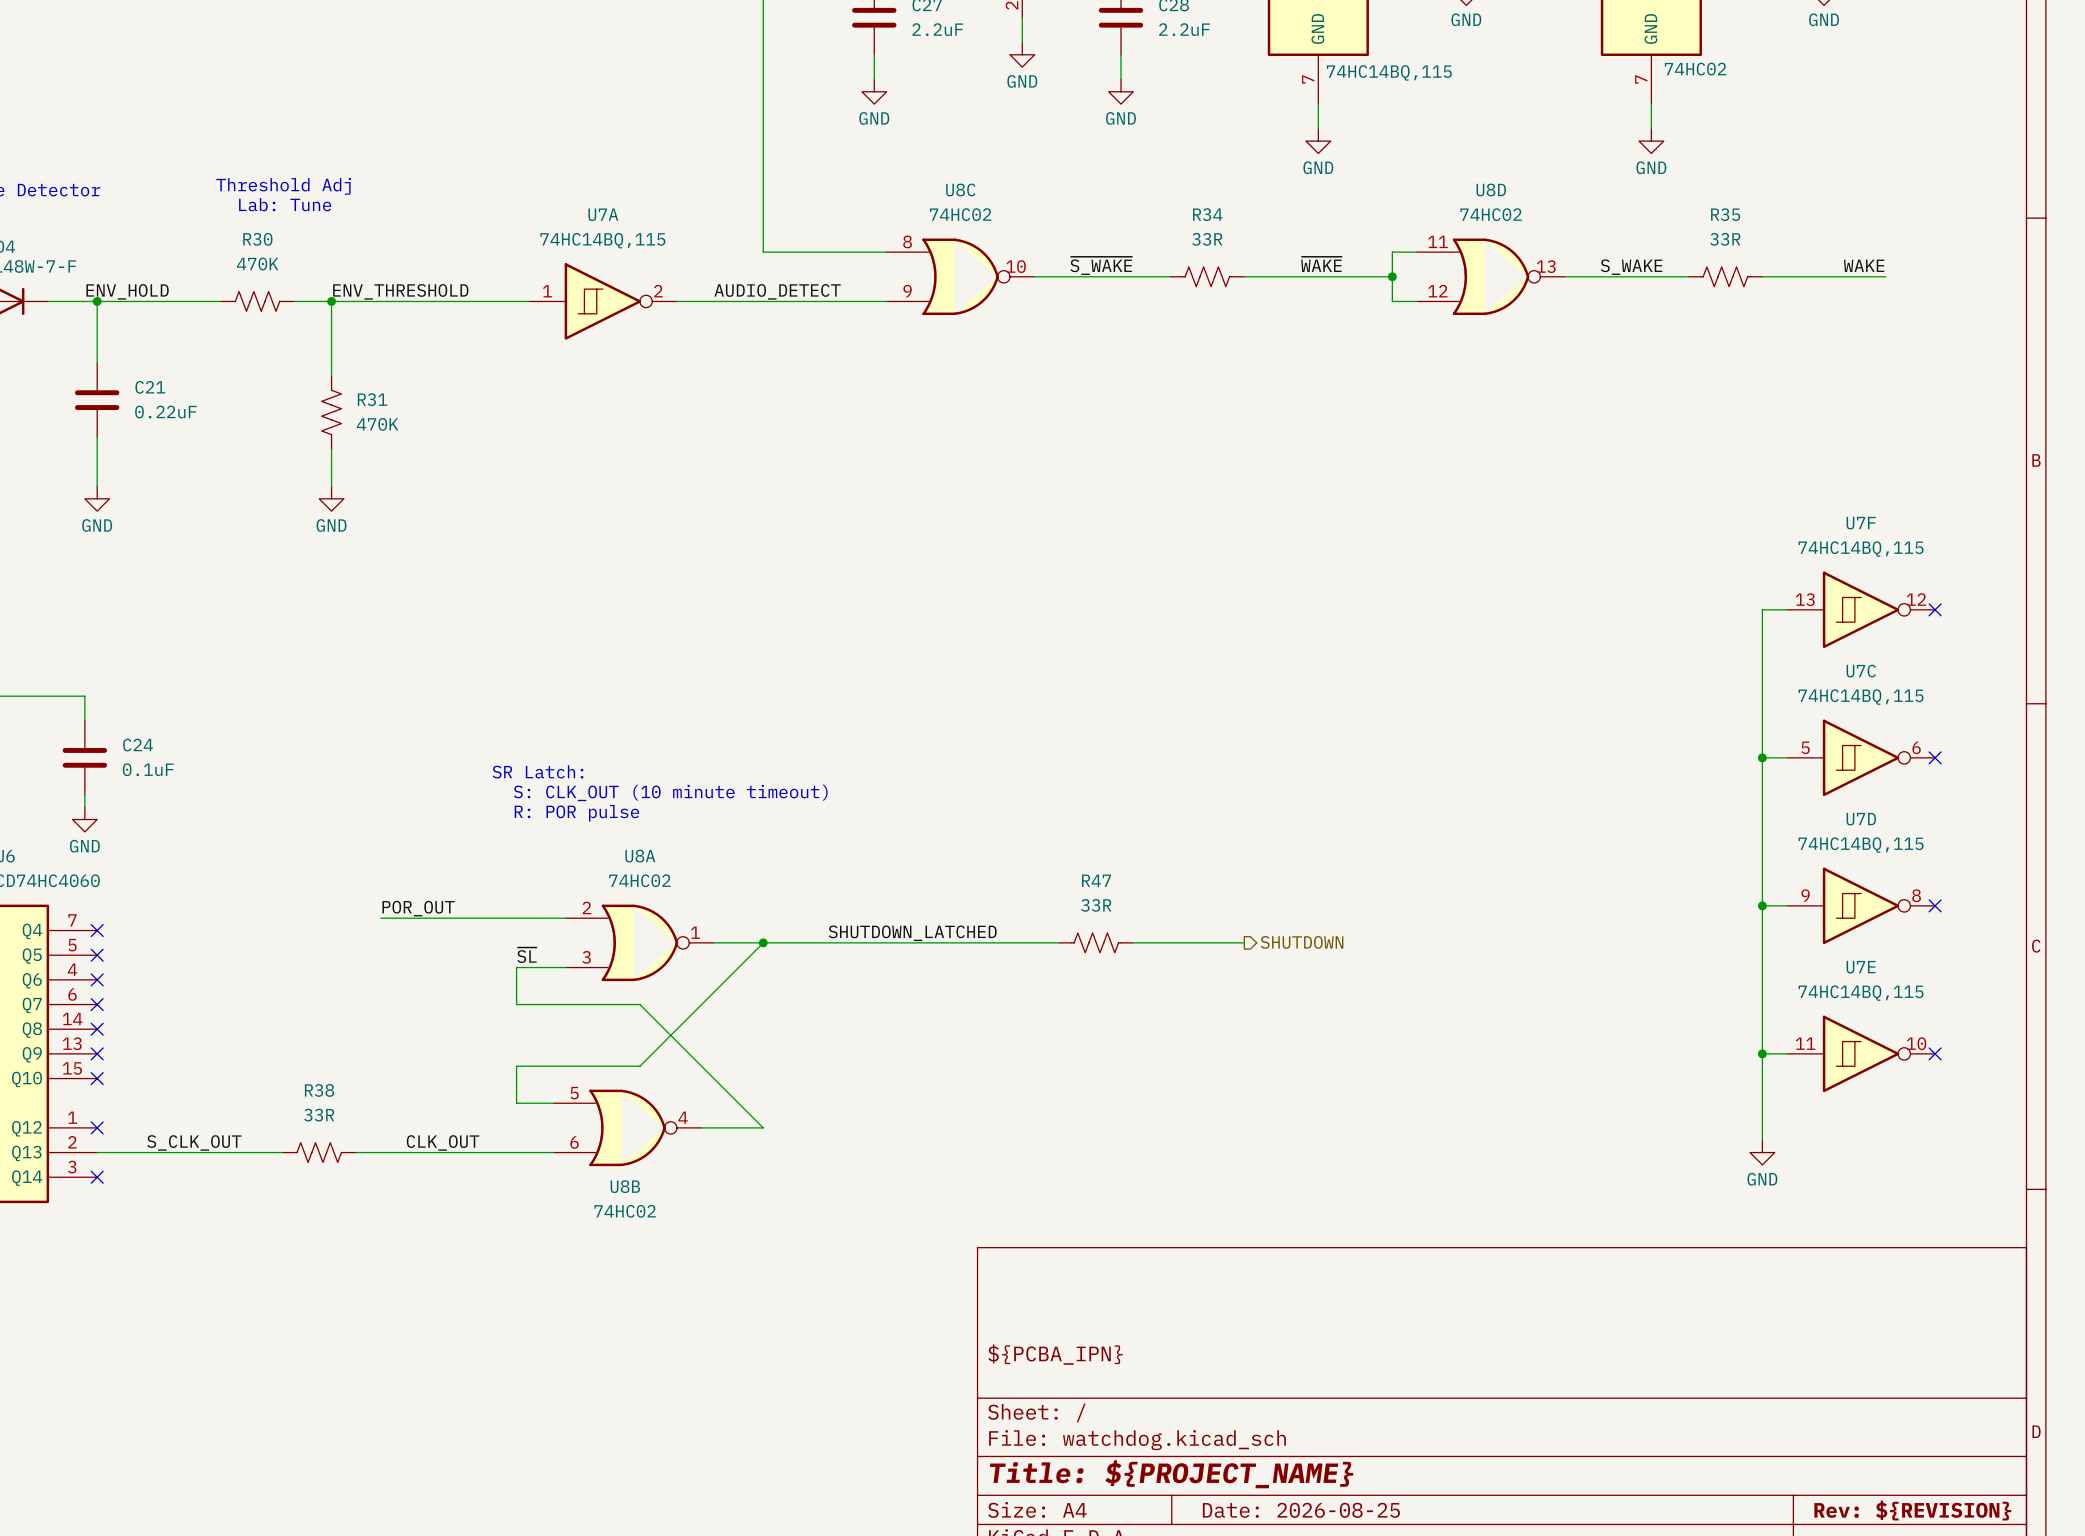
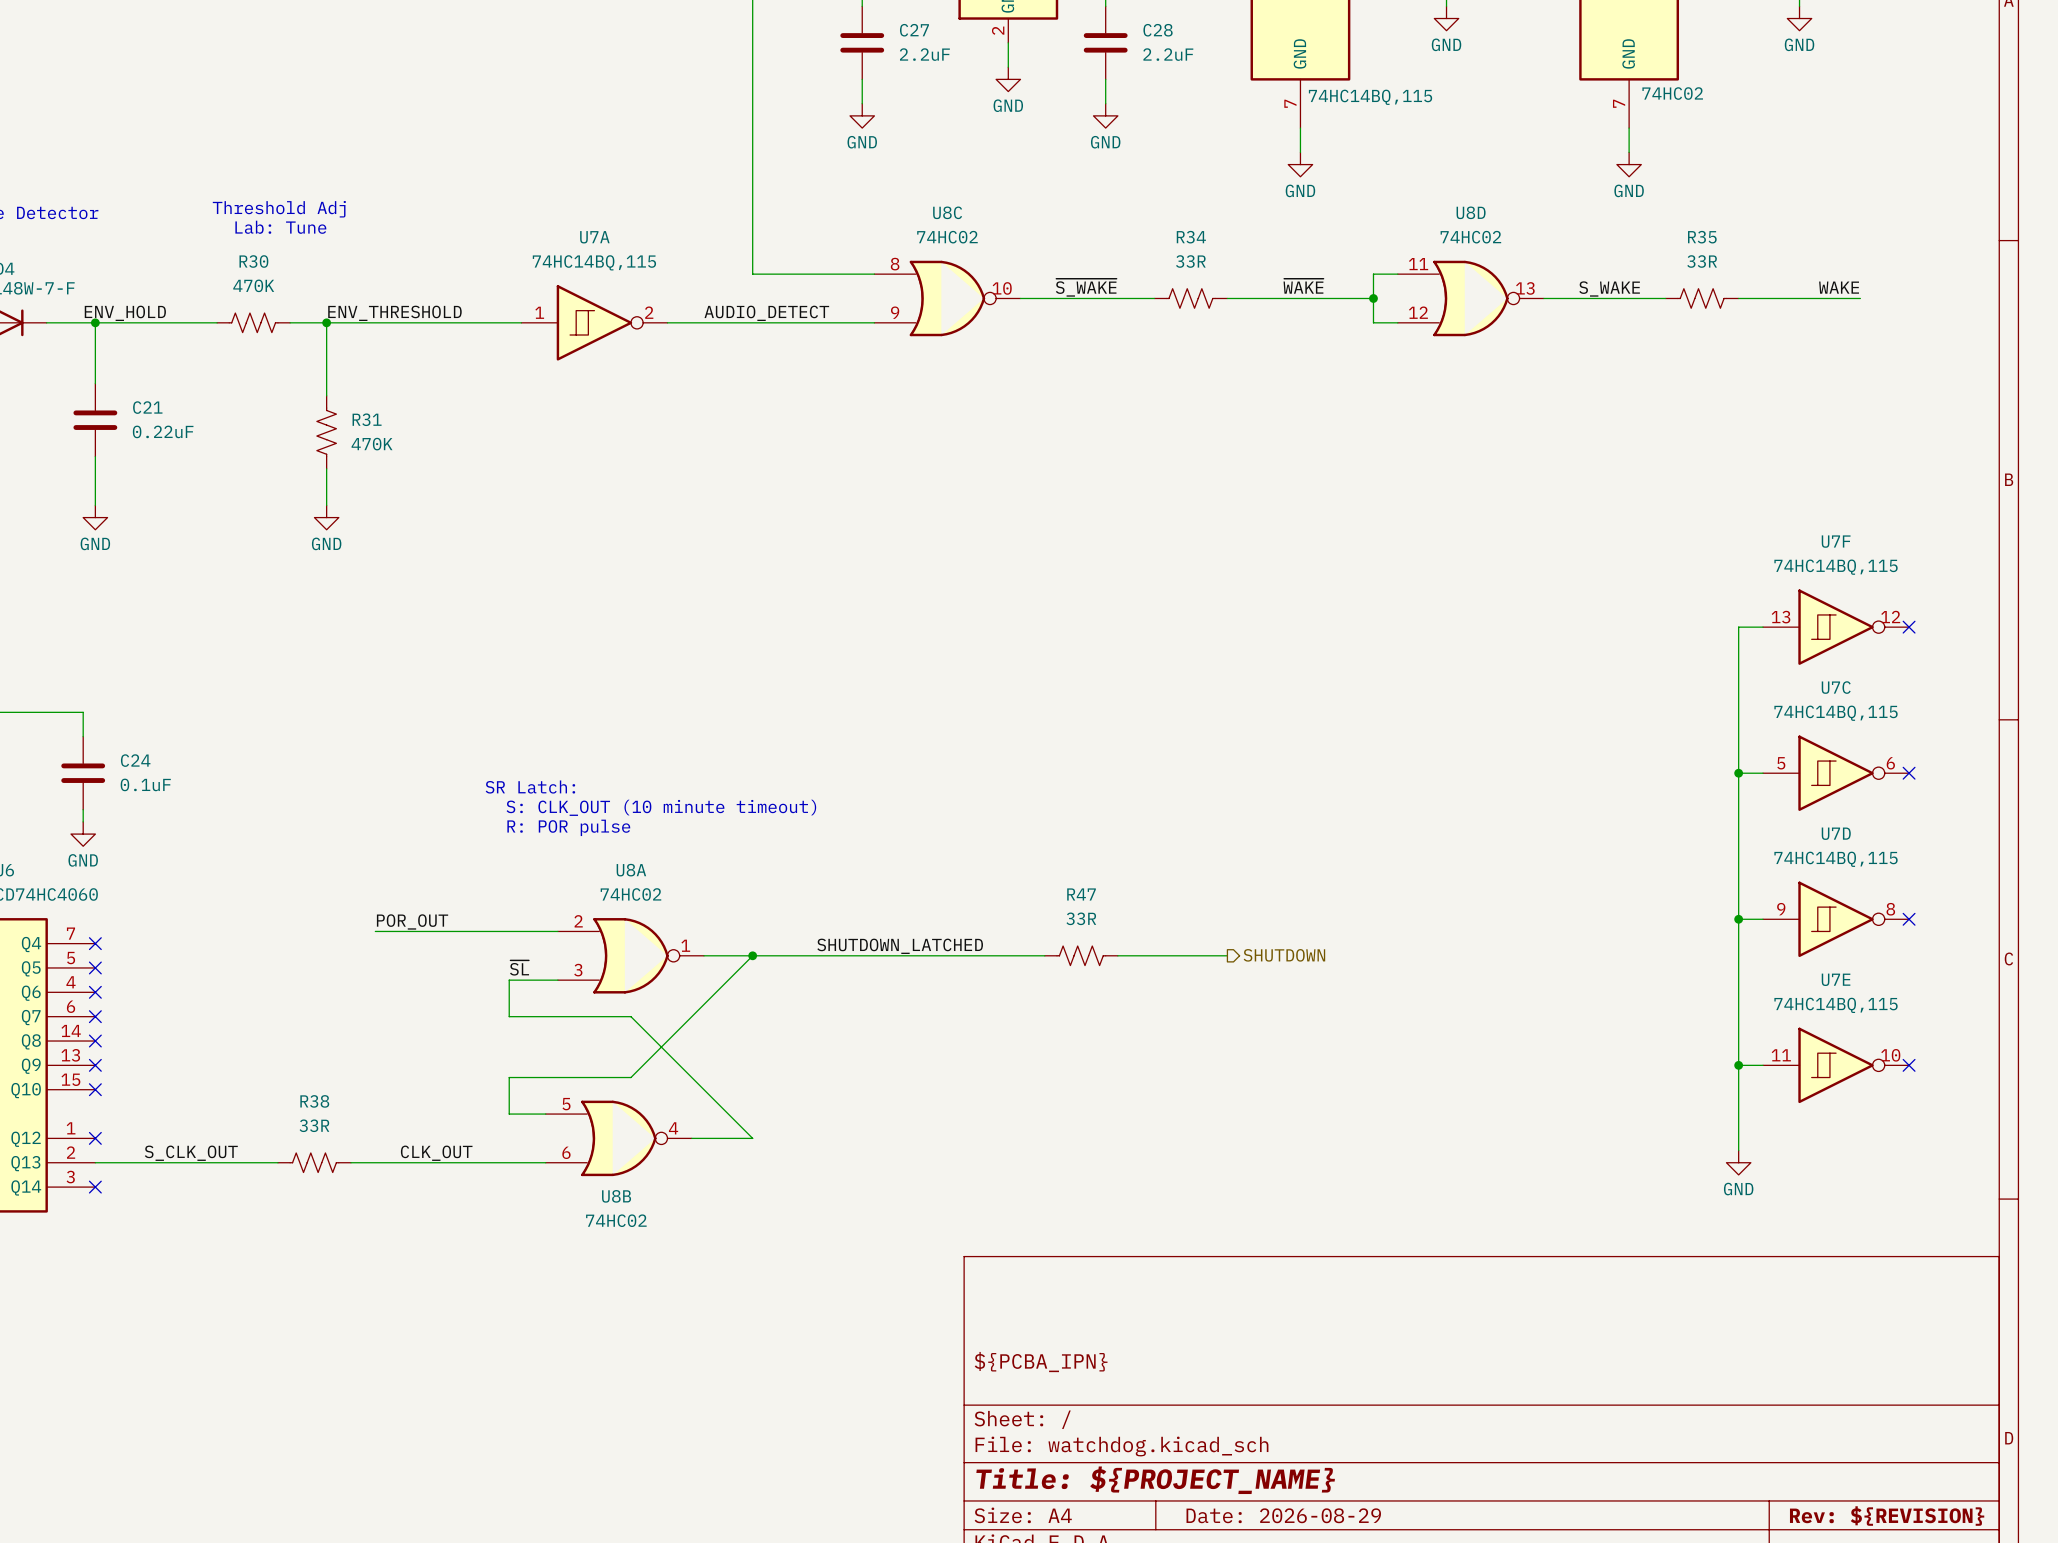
title block: Date: 2026-08-25 (1301, 1510) -> Date: 2026-08-29 (1283, 1515)

